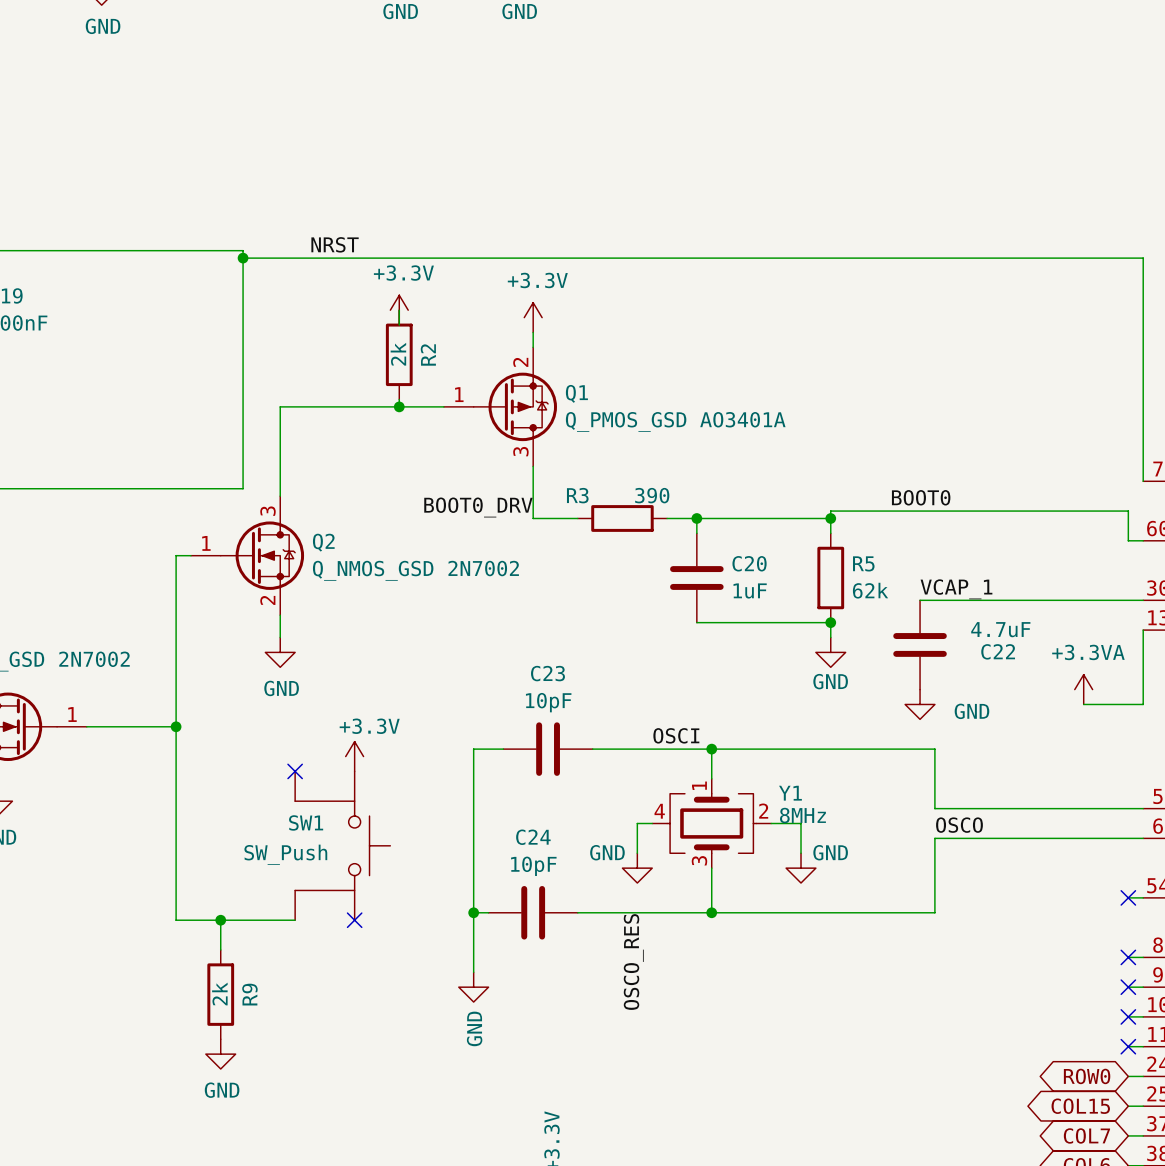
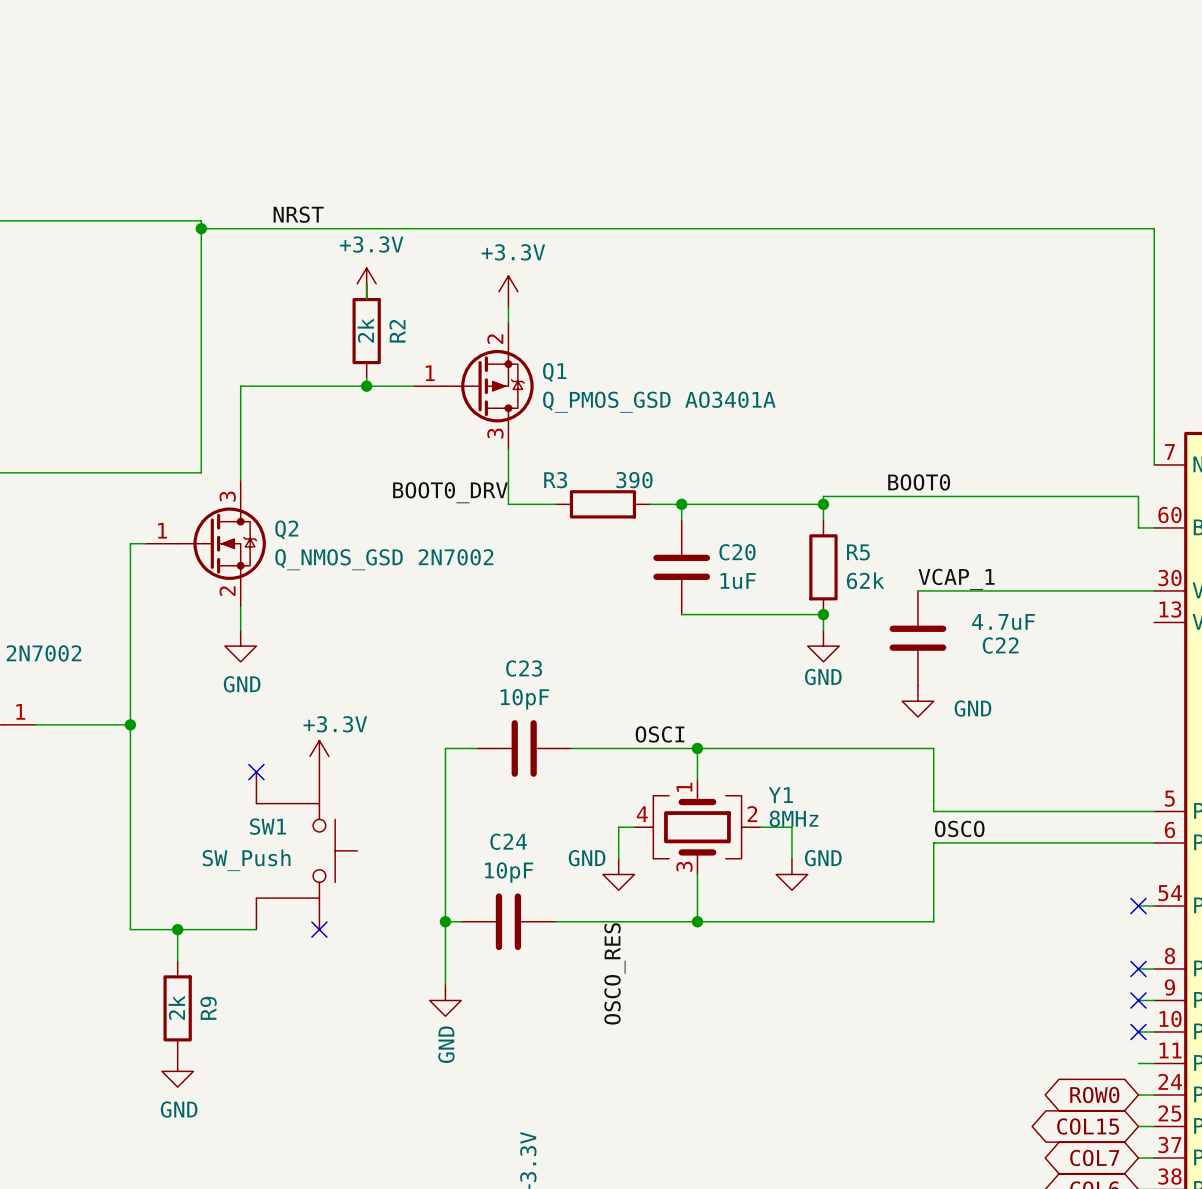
wire: (1143, 630) (1143, 704) (1083, 704) -> none
power symbol: +3.3VA (1083, 689) -> none
no-connect mark: (1128, 1046) -> none

